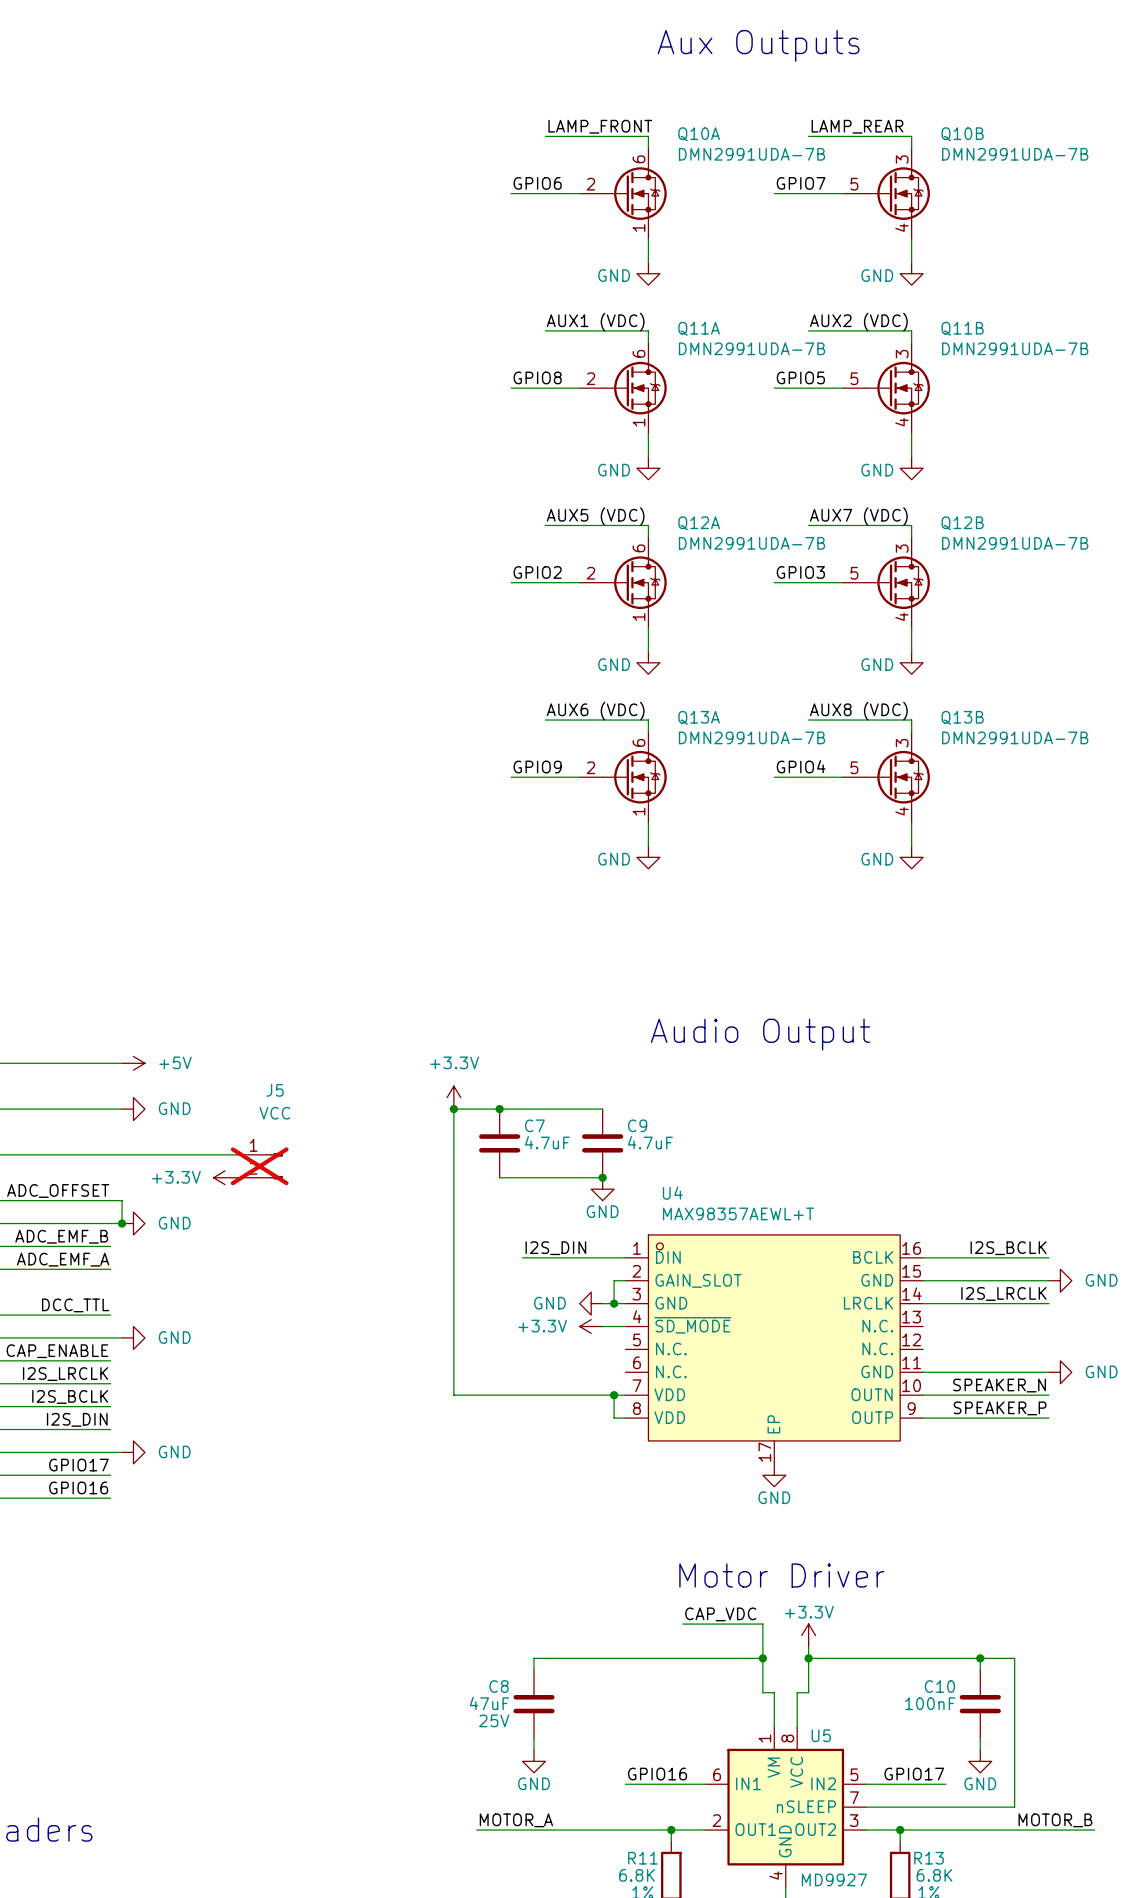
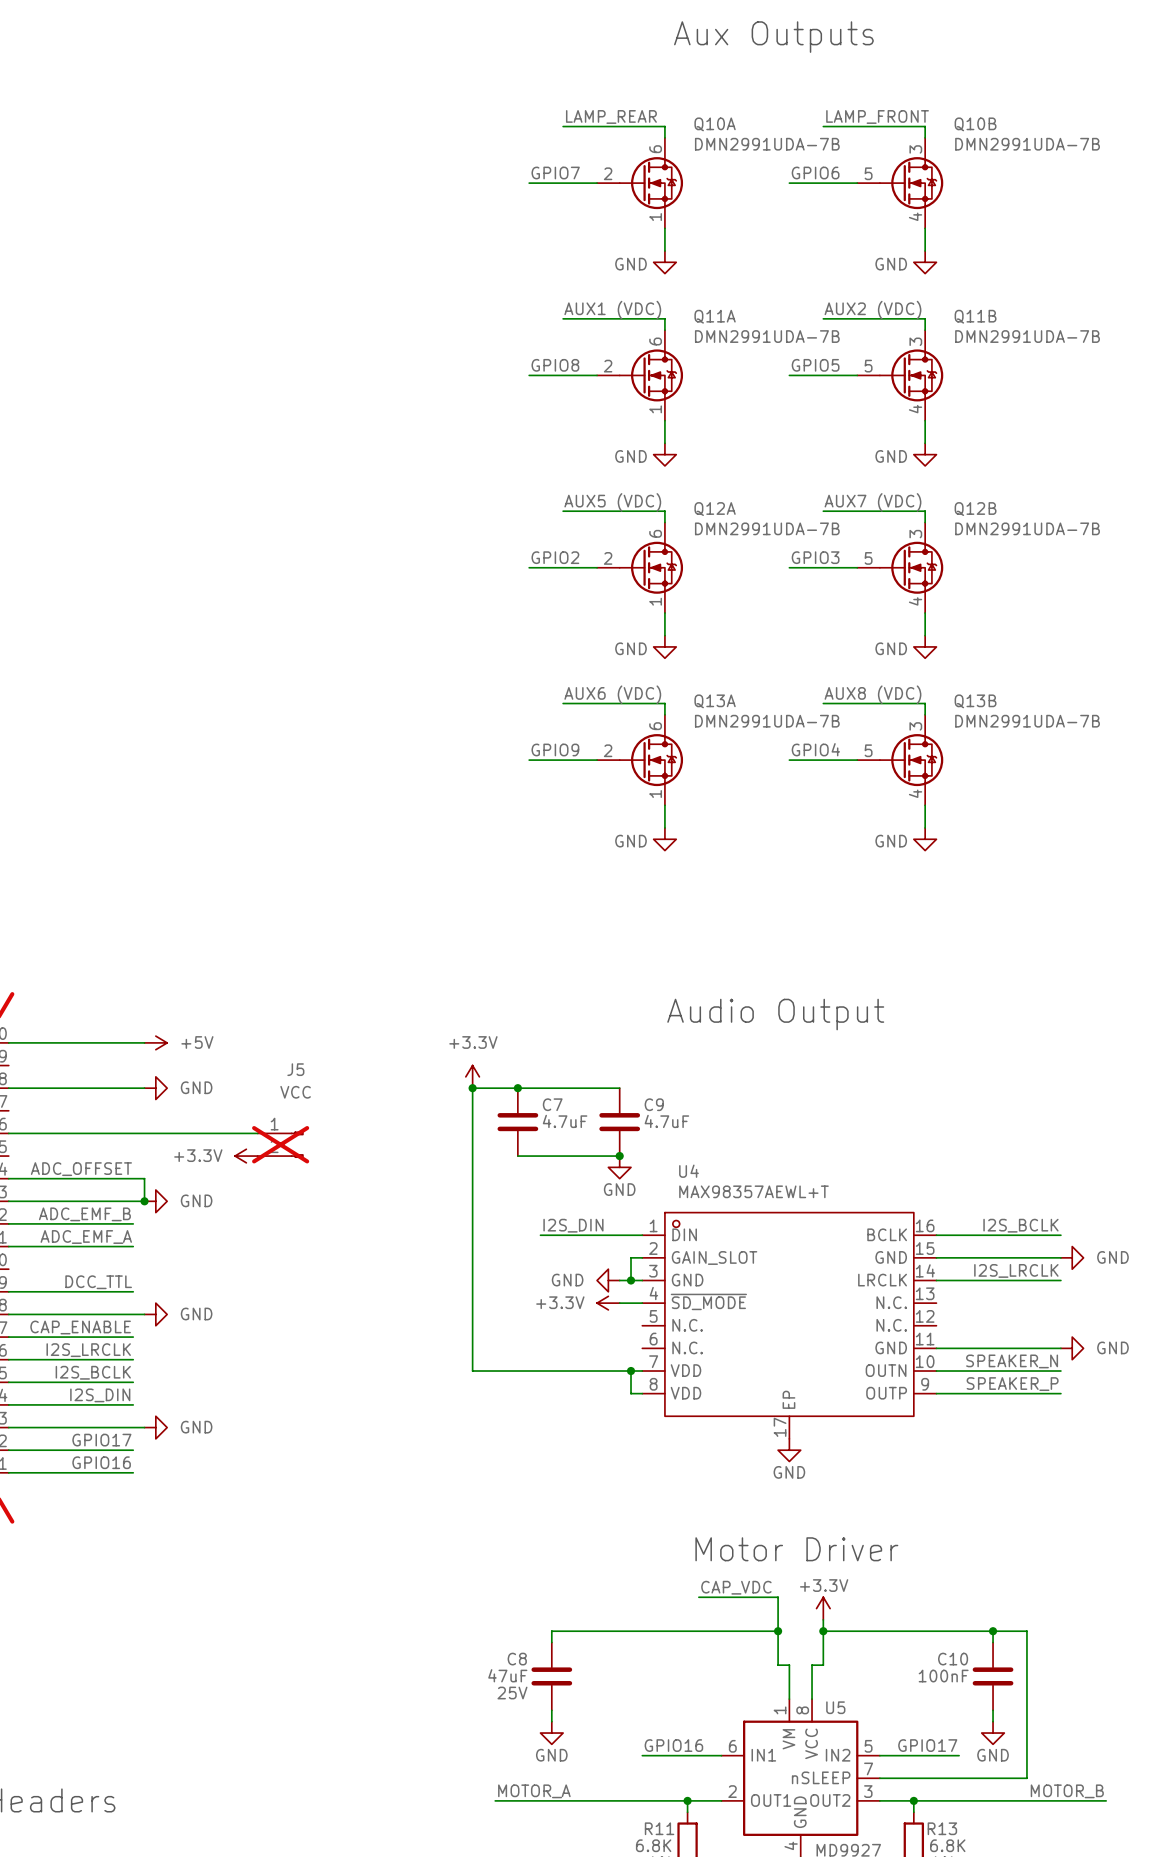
label: LAMP_FRONT (600, 126) -> LAMP_REAR (611, 116)
label: LAMP_REAR (857, 126) -> LAMP_FRONT (877, 116)
label: GPIO6 (537, 183) -> GPIO7 (555, 173)
label: GPIO7 (801, 183) -> GPIO6 (815, 173)

